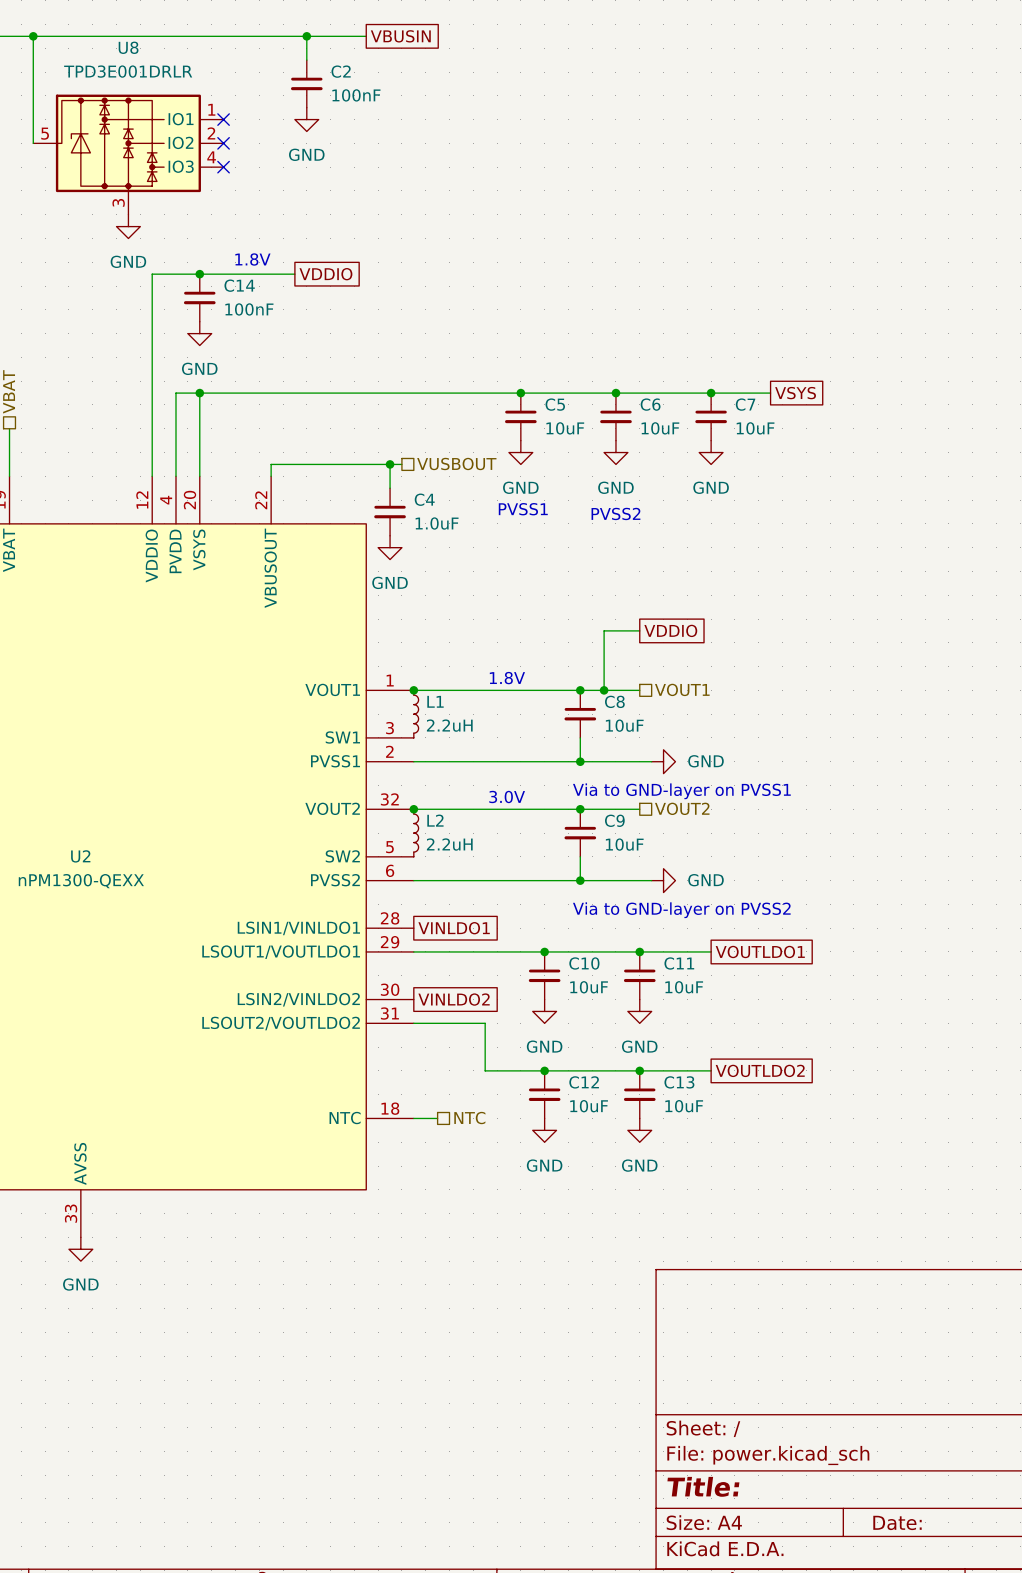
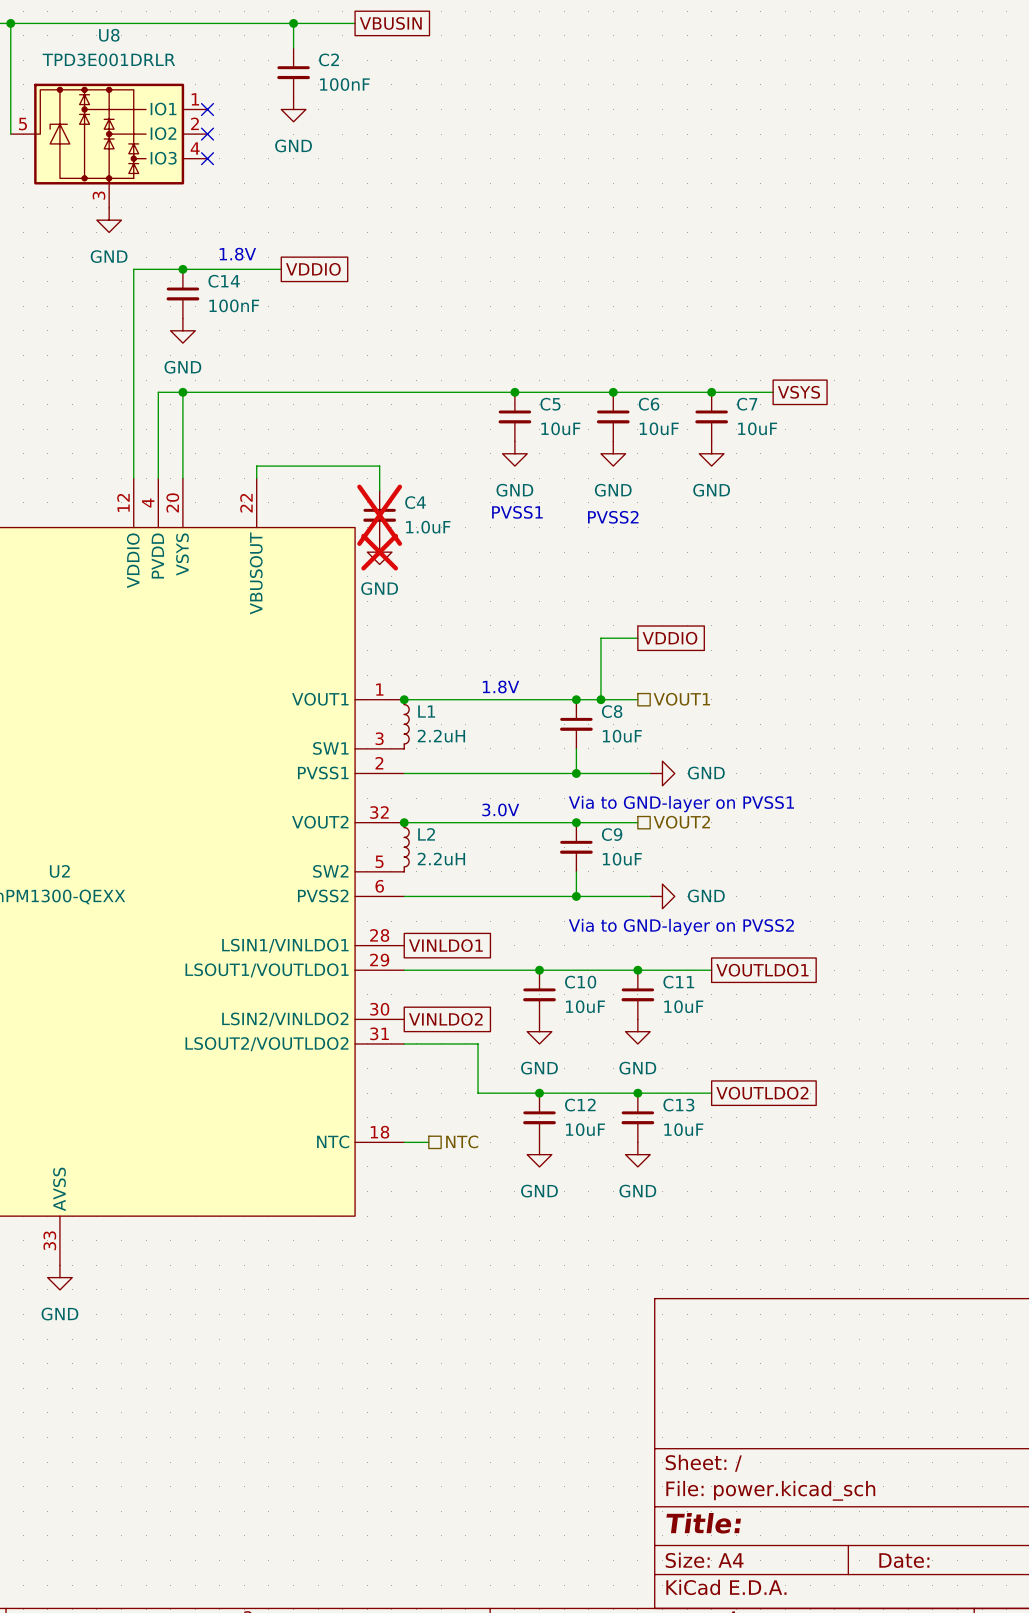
hierarchical label: VUSBOUT (456, 463) -> none
wire: (390, 464) (401, 464) -> none
junction: (390, 464) -> none
C4 do-not-place cross: none -> (379, 515)
power symbol do-not-place cross: none -> (379, 552)

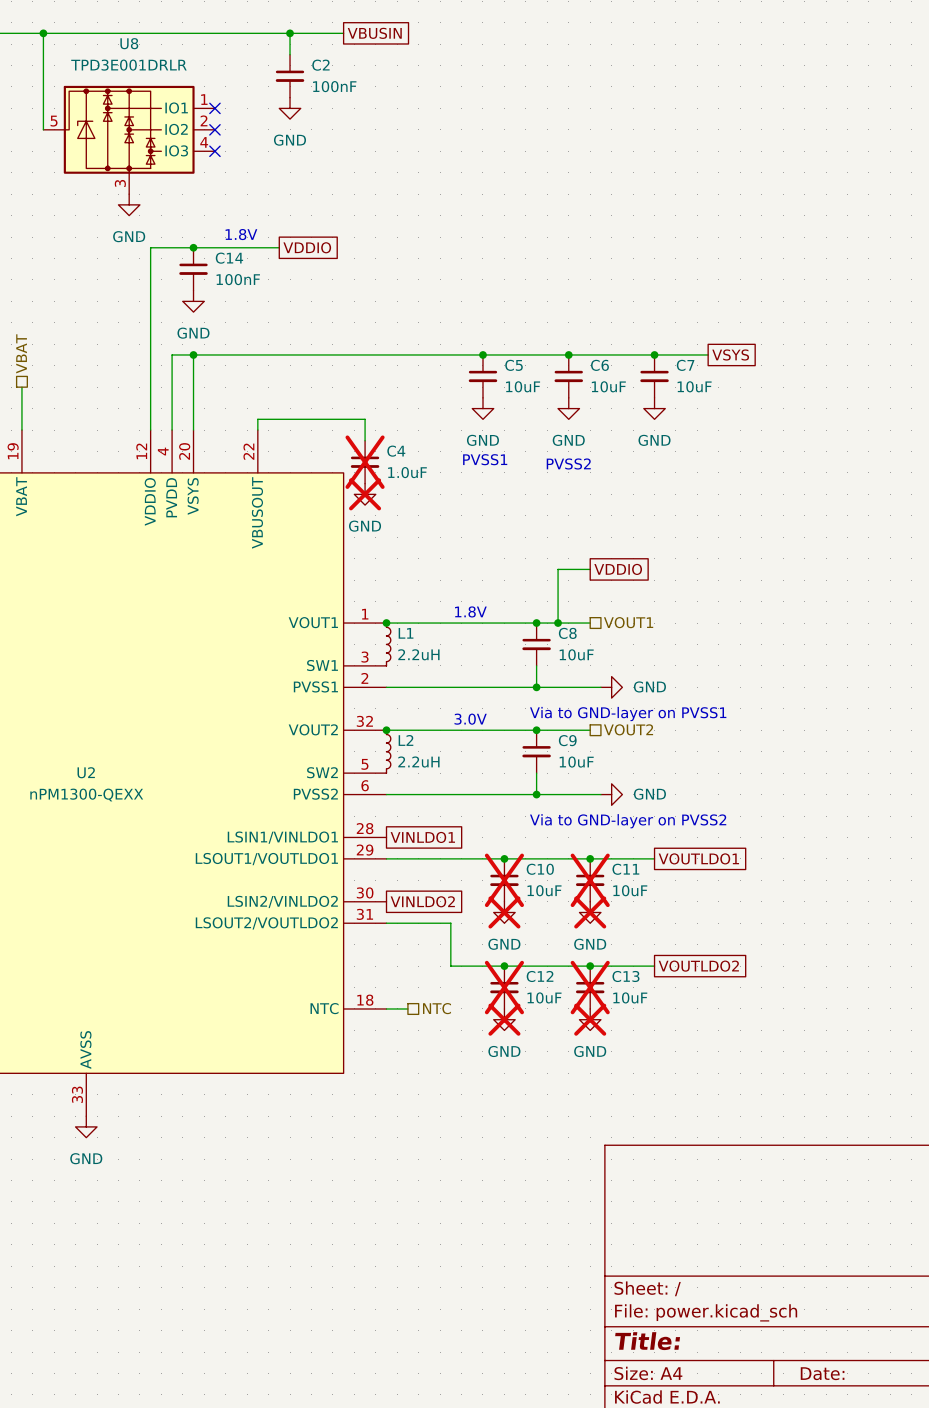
C10 do-not-place cross: none -> (504, 880)
C11 do-not-place cross: none -> (590, 880)
power symbol do-not-place cross: none -> (504, 912)
power symbol do-not-place cross: none -> (590, 912)
C12 do-not-place cross: none -> (504, 987)
C13 do-not-place cross: none -> (590, 987)
power symbol do-not-place cross: none -> (504, 1019)
power symbol do-not-place cross: none -> (590, 1019)

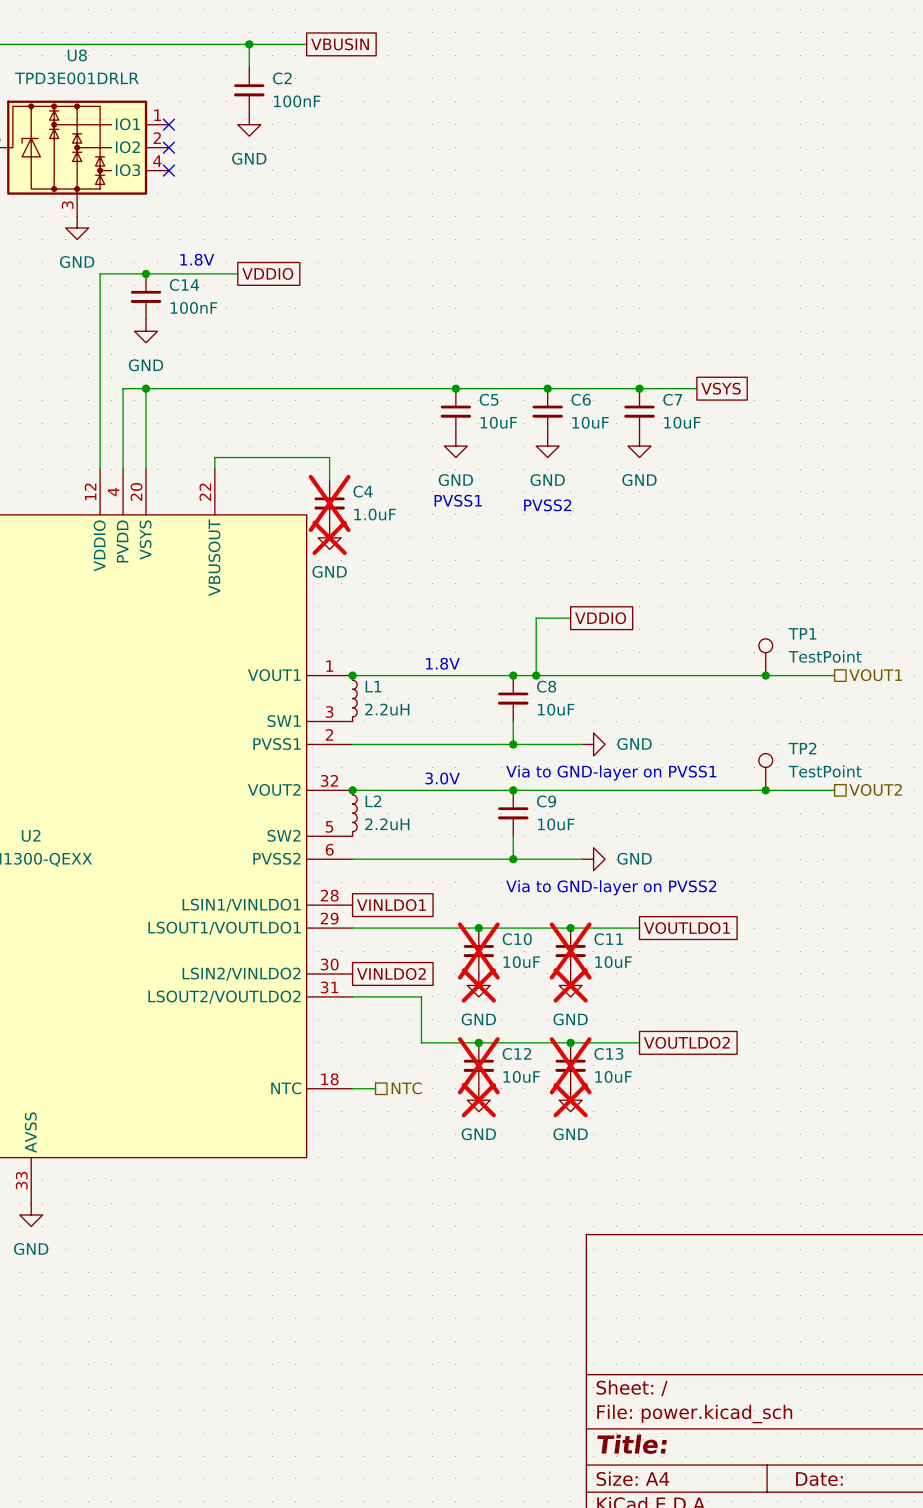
TP1: none -> TestPoint (765, 657)
hierarchical label: VOUT1 (628, 622) -> none
hierarchical label: none -> VOUT1 (875, 675)
wire: none -> (570, 675) (834, 675)
junction: none -> (765, 675)
TP2: none -> TestPoint (765, 771)
hierarchical label: VOUT2 (628, 729) -> none
hierarchical label: none -> VOUT2 (875, 789)
wire: none -> (570, 790) (834, 790)
junction: none -> (765, 790)

